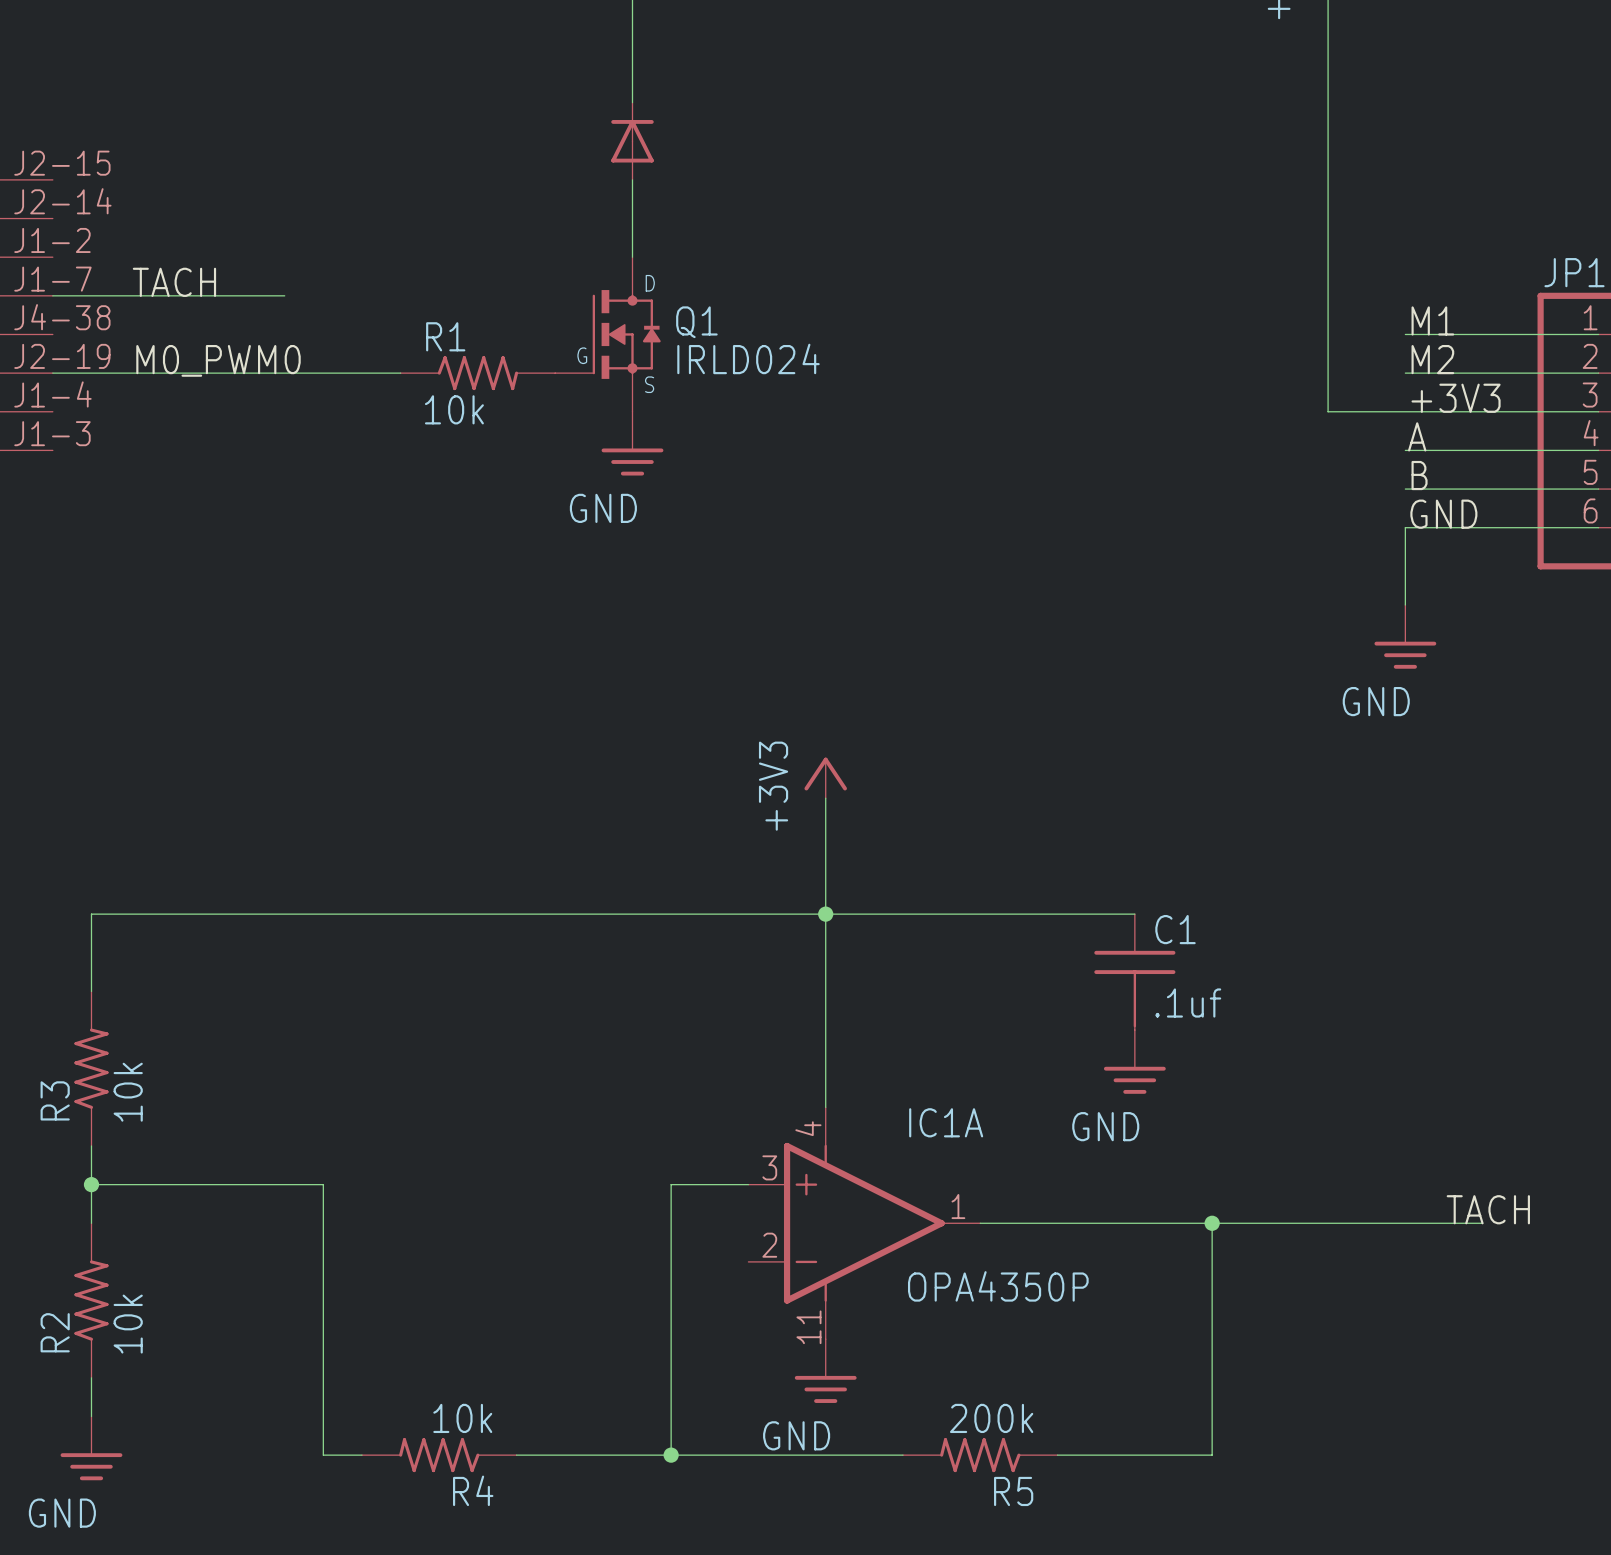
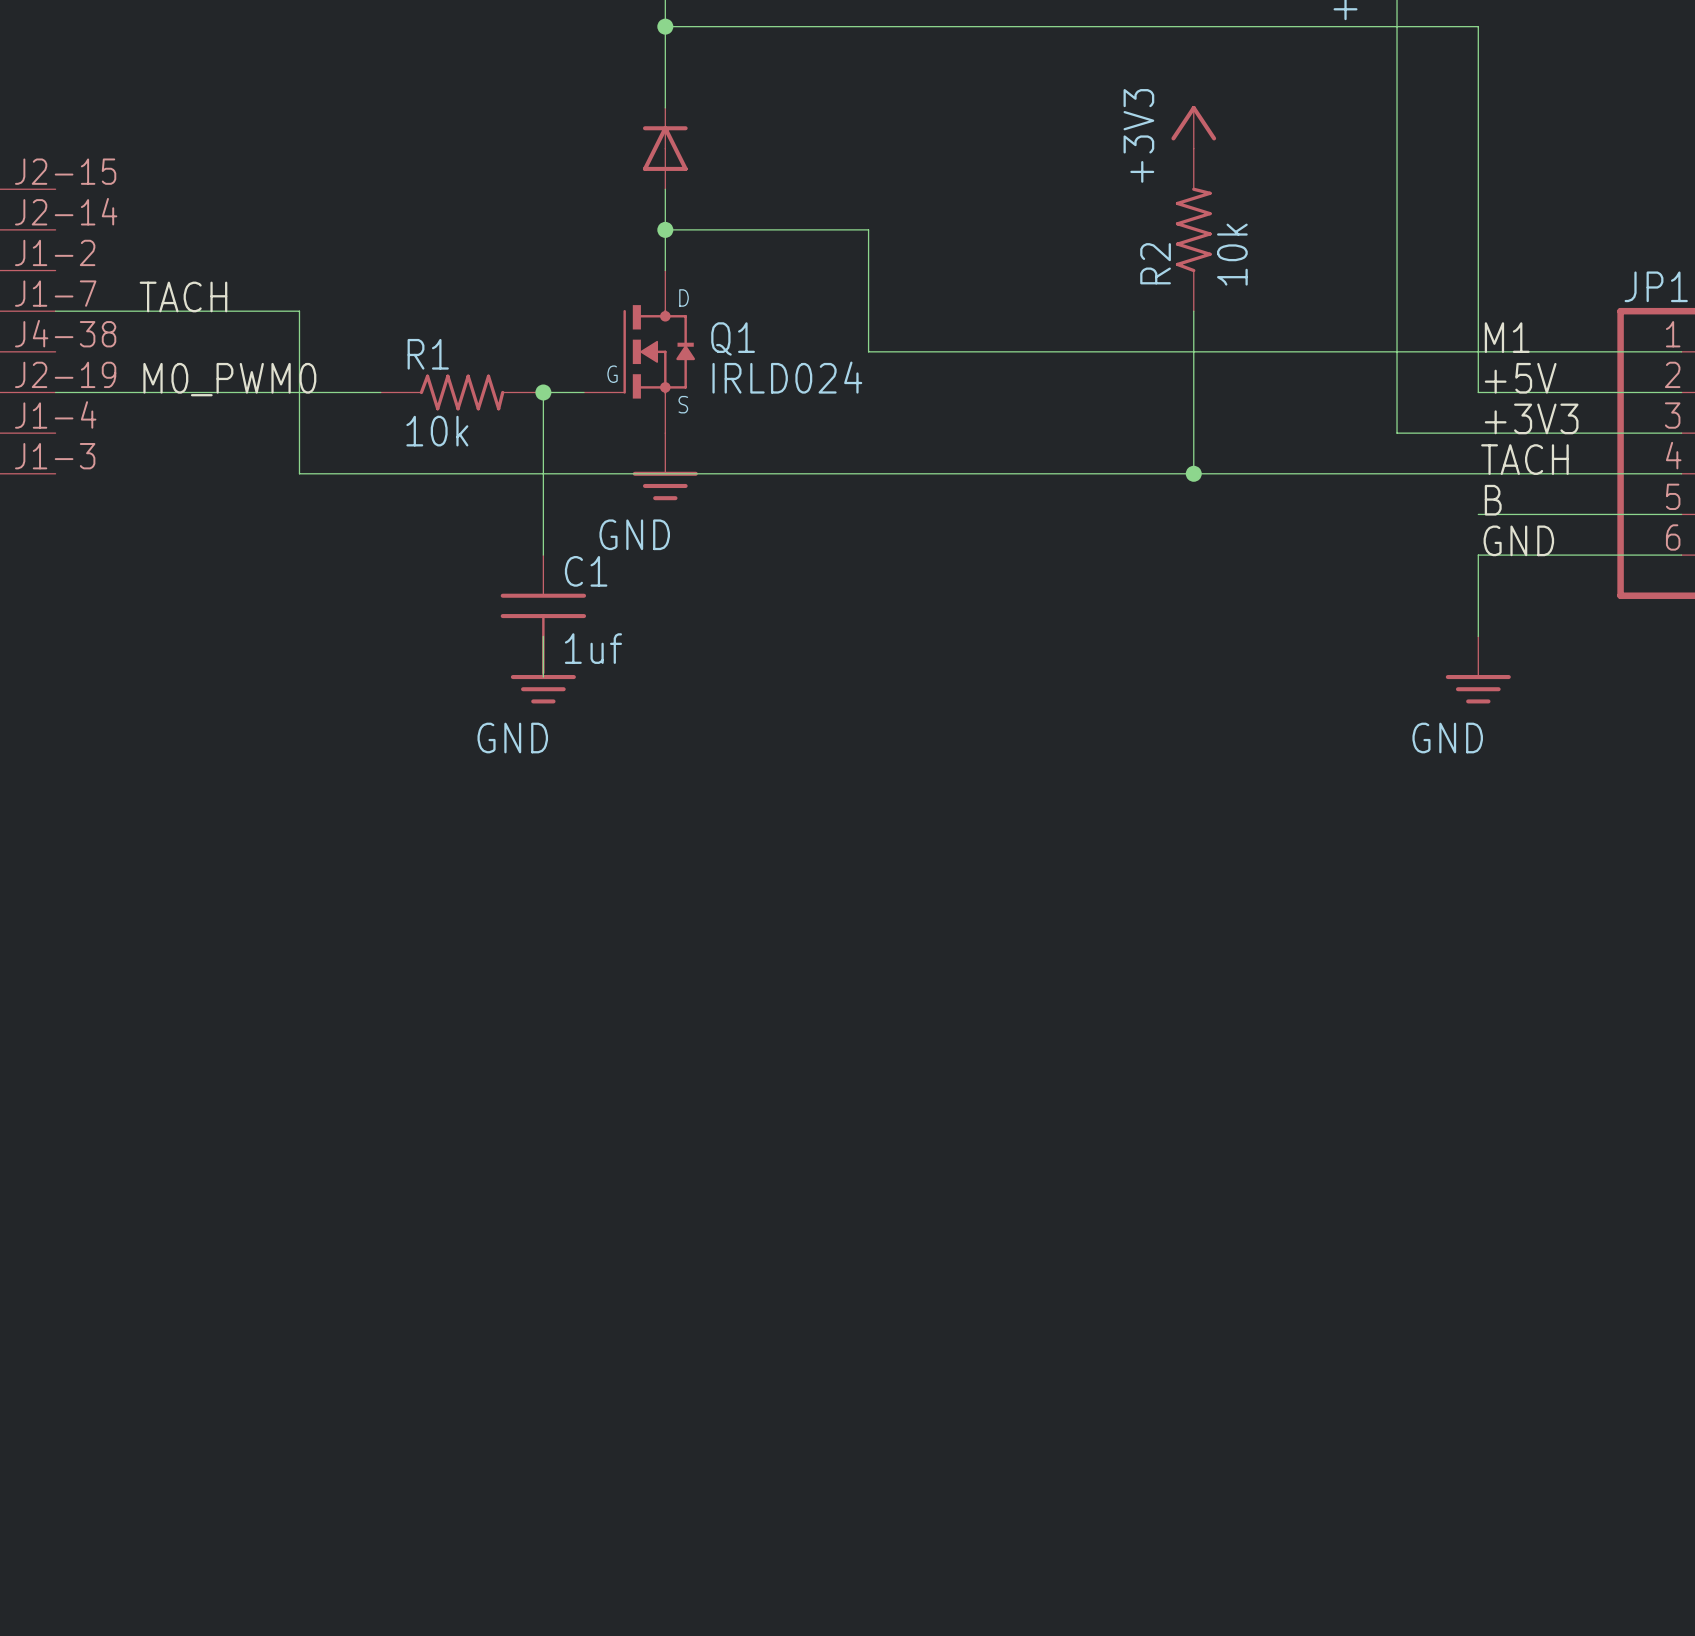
wire: none -> (665, 26) (1478, 26) (1478, 392)
junction: none -> (665, 26)
power symbol: none -> +3V3 (1193, 127)
wire: none -> (665, 229) (868, 229) (868, 351) (1478, 351)
junction: none -> (665, 229)
wire: none -> (299, 311) (299, 473) (1478, 473)
wire: none -> (1193, 311) (1193, 473)
label: M2 (1432, 359) -> +5V (1520, 378)
R1 position: (477, 373) -> (462, 392)
junction: none -> (543, 392)
wire: none -> (584, 392) (543, 392) (543, 555)
label: A (1417, 436) -> TACH (1524, 459)
junction: none -> (1193, 473)
wire: none -> (543, 636) (543, 677)
power symbol: none -> GND (543, 669)
power symbol: +3V3 (825, 777) -> none
wire: (825, 798) (825, 1107) -> none
junction: (825, 914) -> none
wire: (1134, 914) (91, 914) (91, 991) -> none
C1 position: (1134, 972) -> (543, 616)
C1 value: .1uf (1188, 1003) -> 1uf (593, 648)
power symbol: GND (1134, 1061) -> none
R3: 10k (91, 1068) -> none
wire: (91, 1145) (91, 1223) -> none
wire: (91, 1184) (323, 1184) (323, 1455) (361, 1455) -> none
junction: (91, 1184) -> none
wire: (748, 1184) (671, 1184) (671, 1455) -> none
label: TACH (1488, 1209) -> none
IC1A: OPA4350P (864, 1223) -> none
wire: (980, 1223) (1482, 1223) -> none
wire: (1212, 1223) (1212, 1455) (1057, 1455) -> none
junction: (1212, 1223) -> none
R2 position: (91, 1300) -> (1193, 229)
power symbol: GND (825, 1371) -> none
wire: (91, 1377) (91, 1416) -> none
power symbol: GND (91, 1448) -> none
R4: 10k (439, 1455) -> none
wire: (516, 1455) (903, 1455) -> none
junction: (671, 1455) -> none
R5: 200k (980, 1455) -> none

